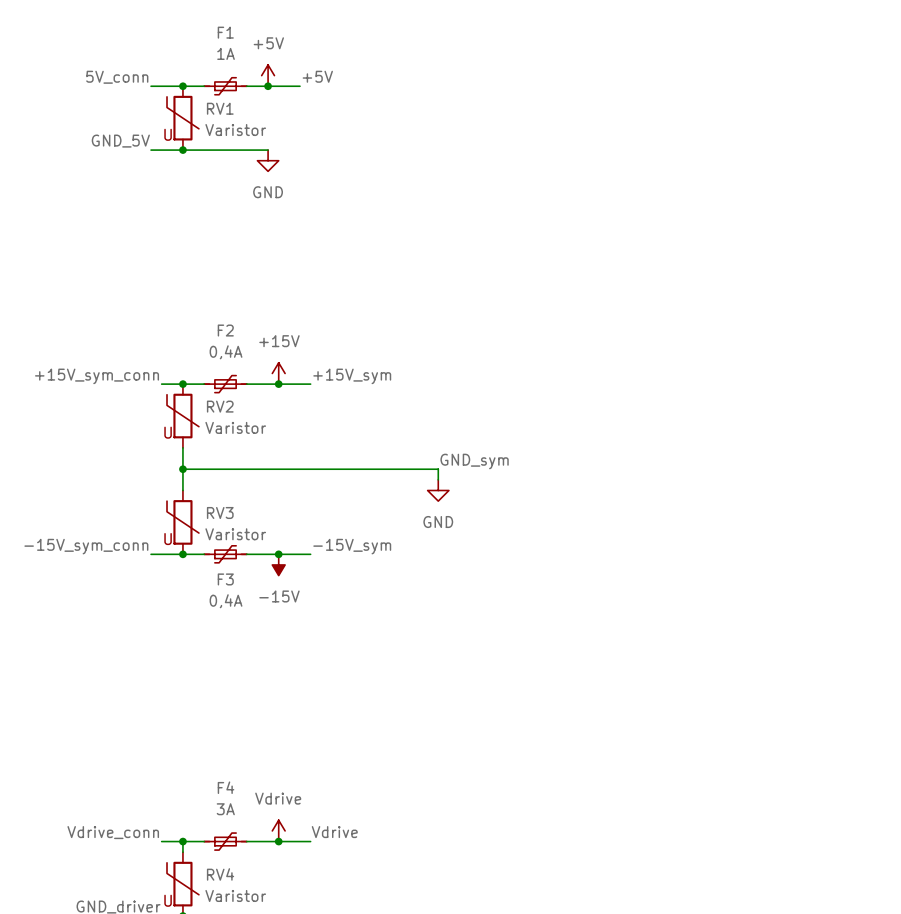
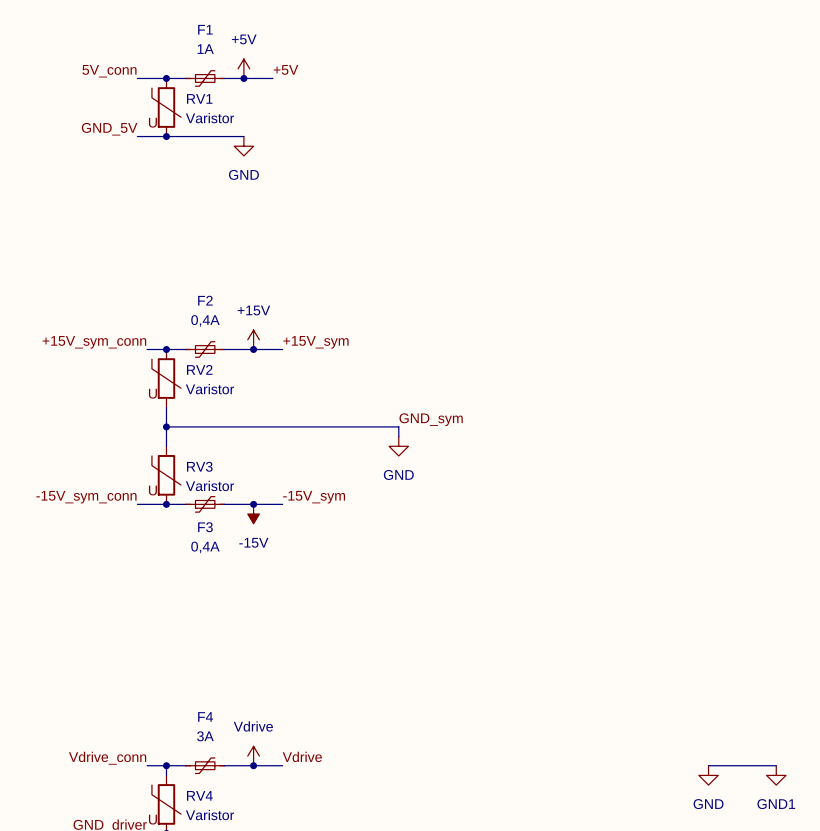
wire: none -> (708, 765) (776, 765)
power symbol: none -> GND (708, 775)
power symbol: none -> GND1 (776, 775)

